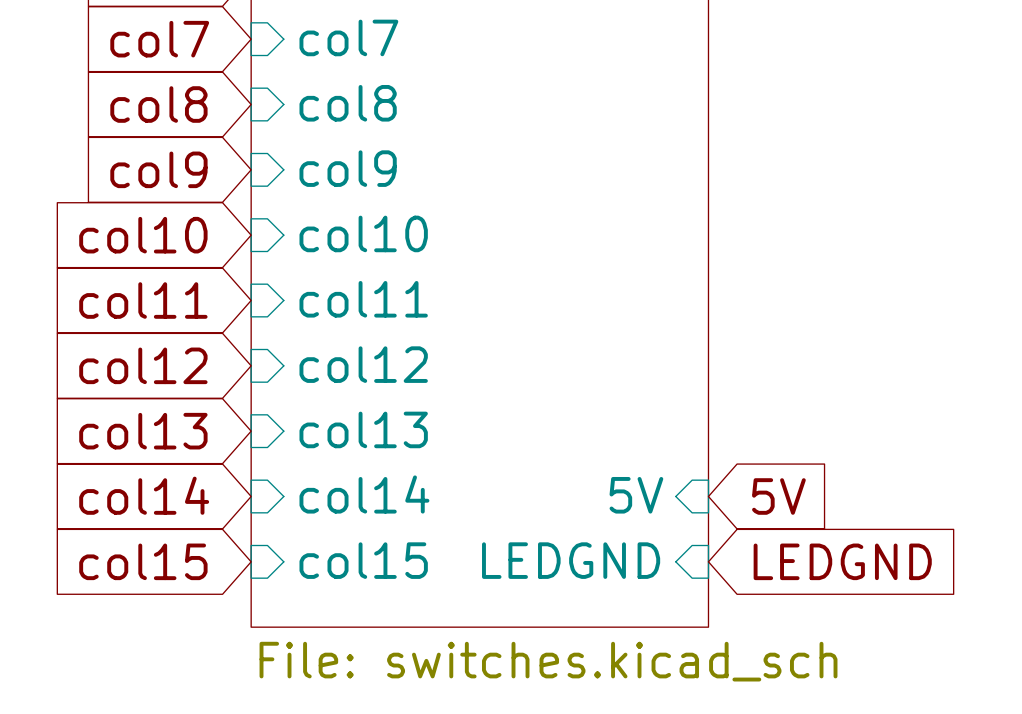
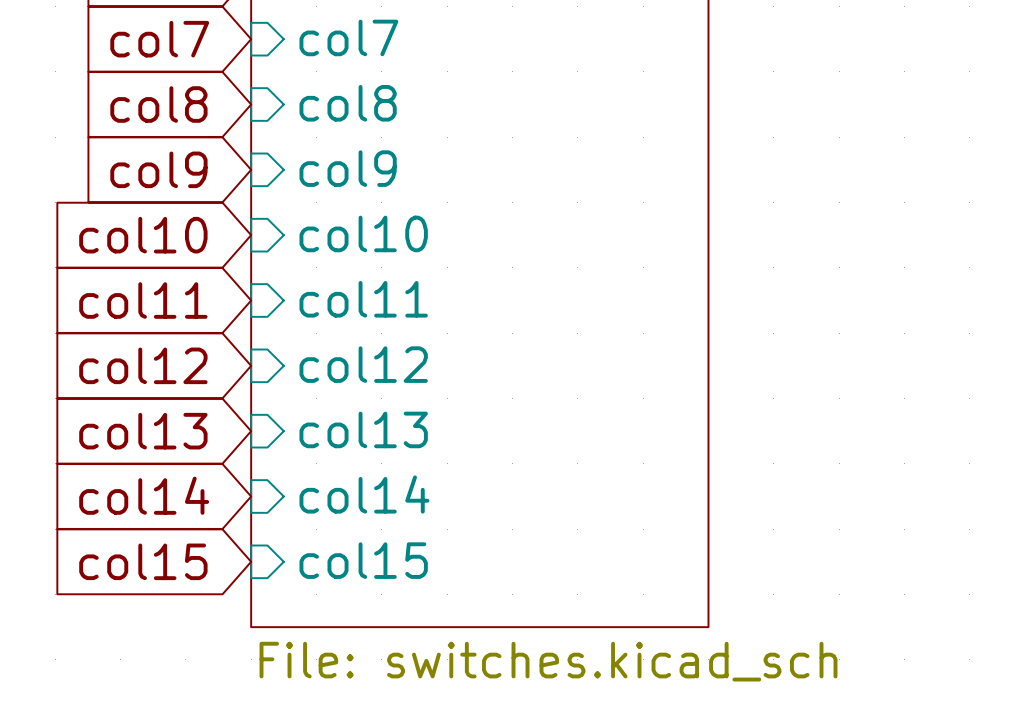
sheet pin: 5V (636, 495) -> none
global label: 5V (778, 496) -> none
sheet pin: LEDGND (571, 560) -> none
global label: LEDGND (842, 561) -> none

